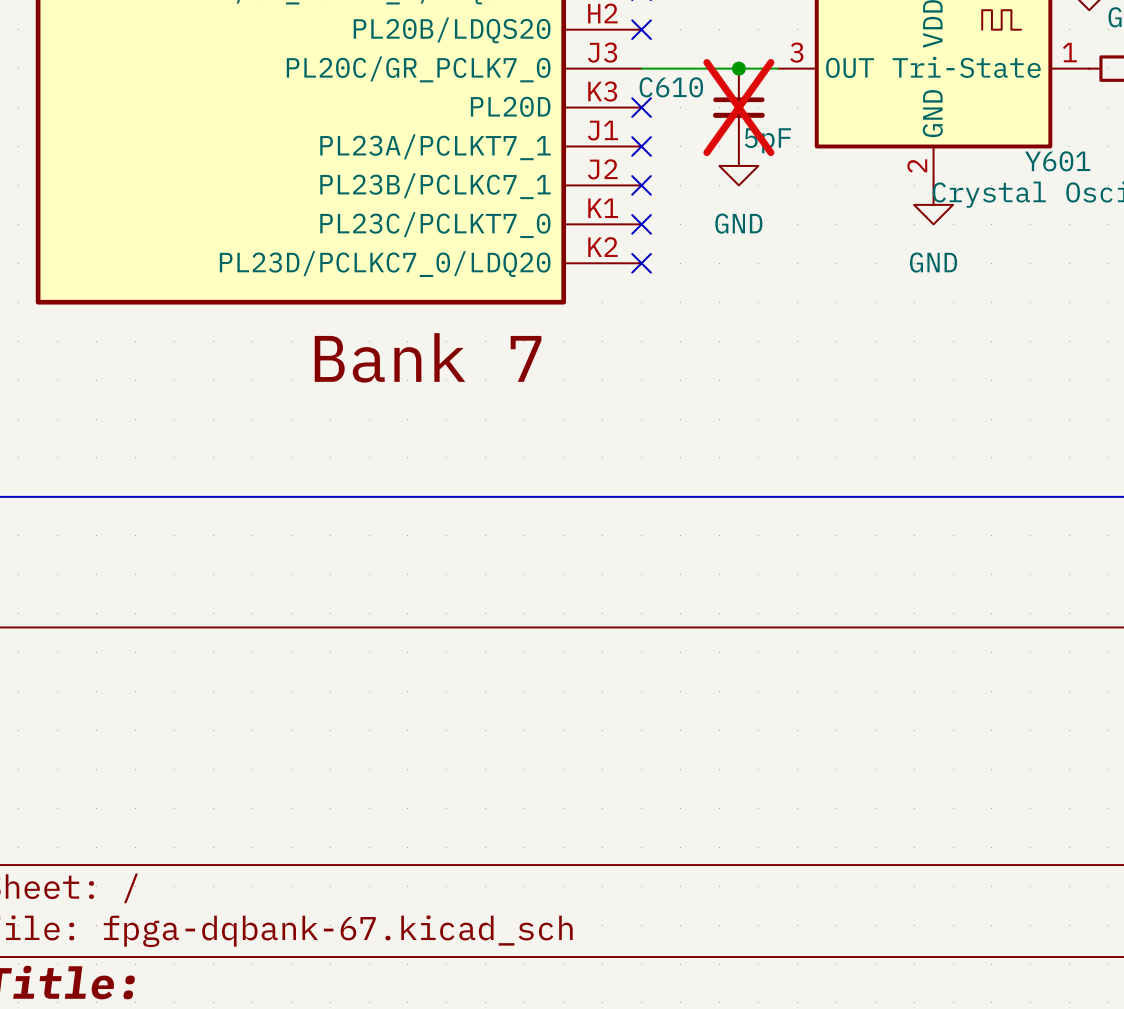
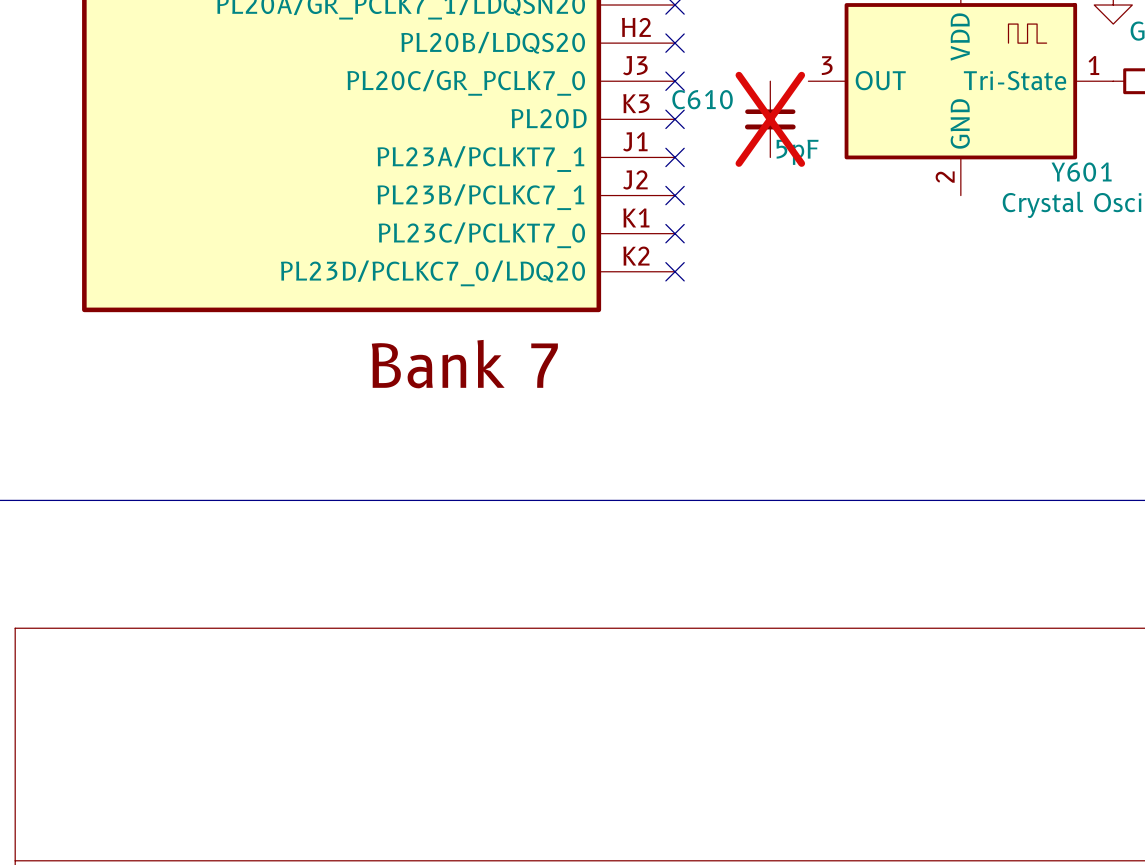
wire: (641, 68) (777, 68) -> none
no-connect mark: none -> (675, 81)
junction: (738, 68) -> none
power symbol: GND (738, 165) -> none
power symbol: GND (933, 204) -> none

